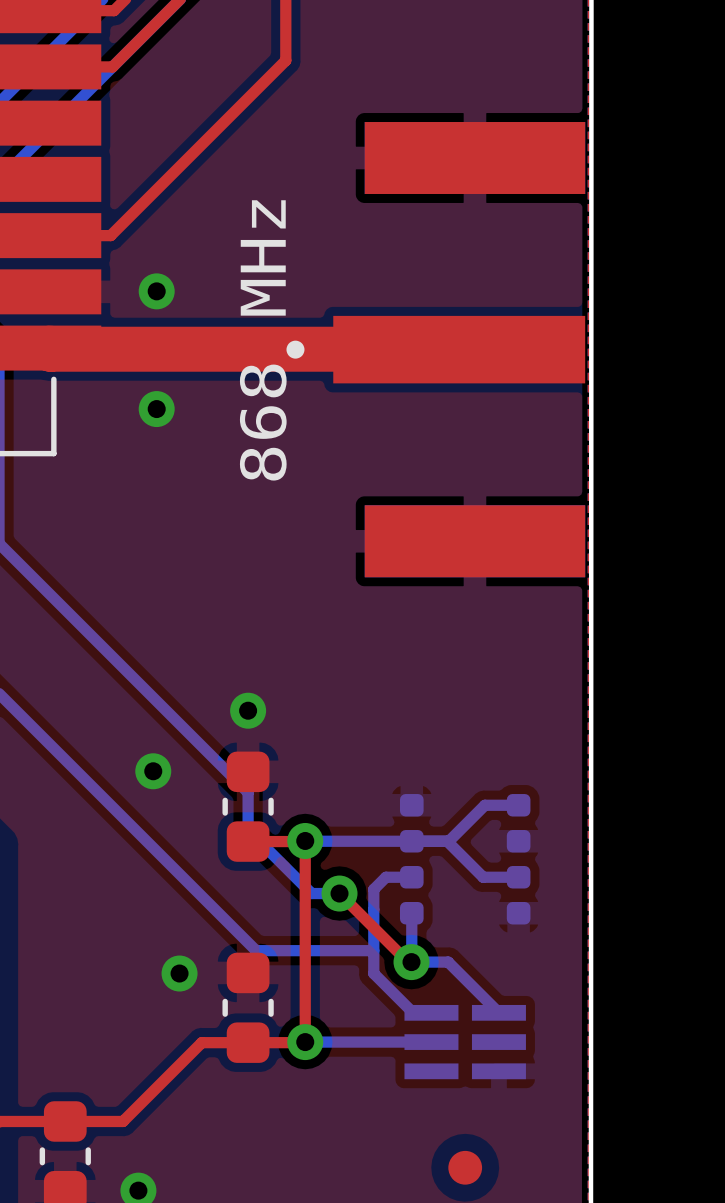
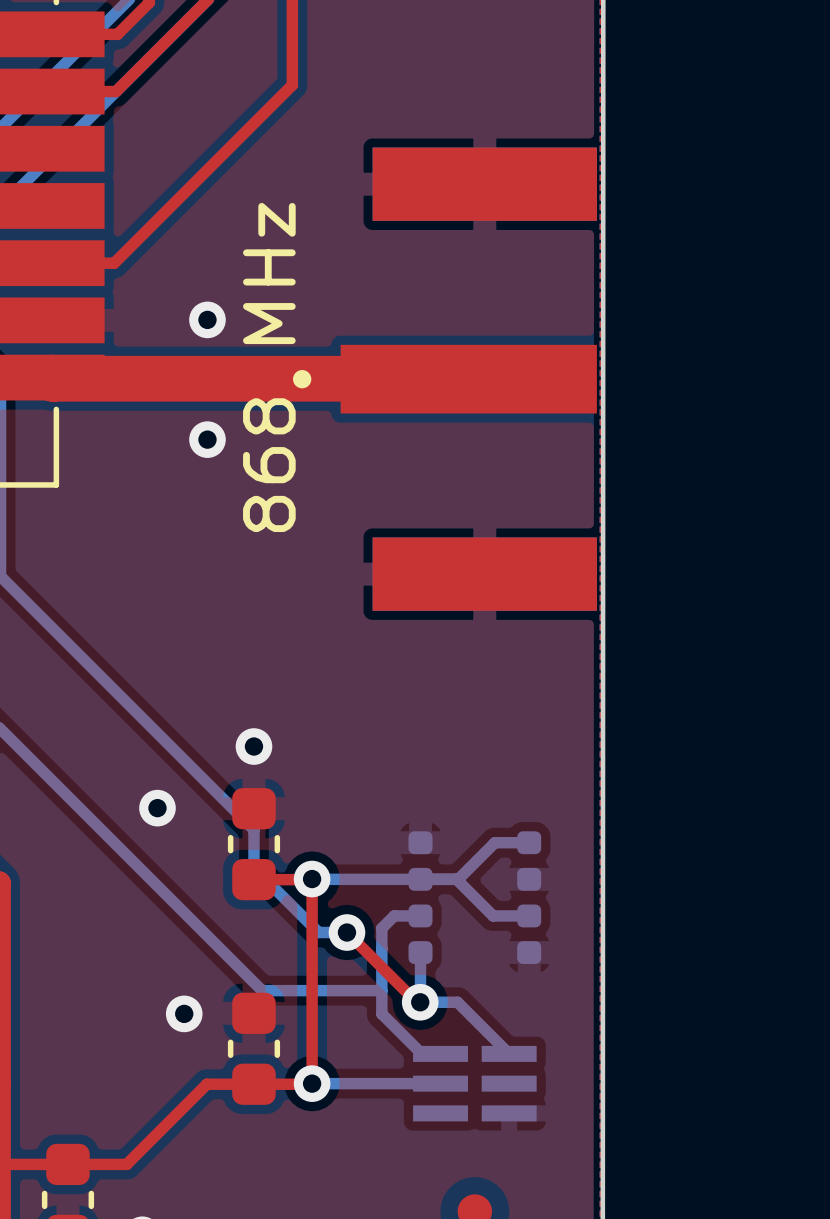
via position: (156, 291) -> (207, 319)
via position: (156, 409) -> (207, 439)

